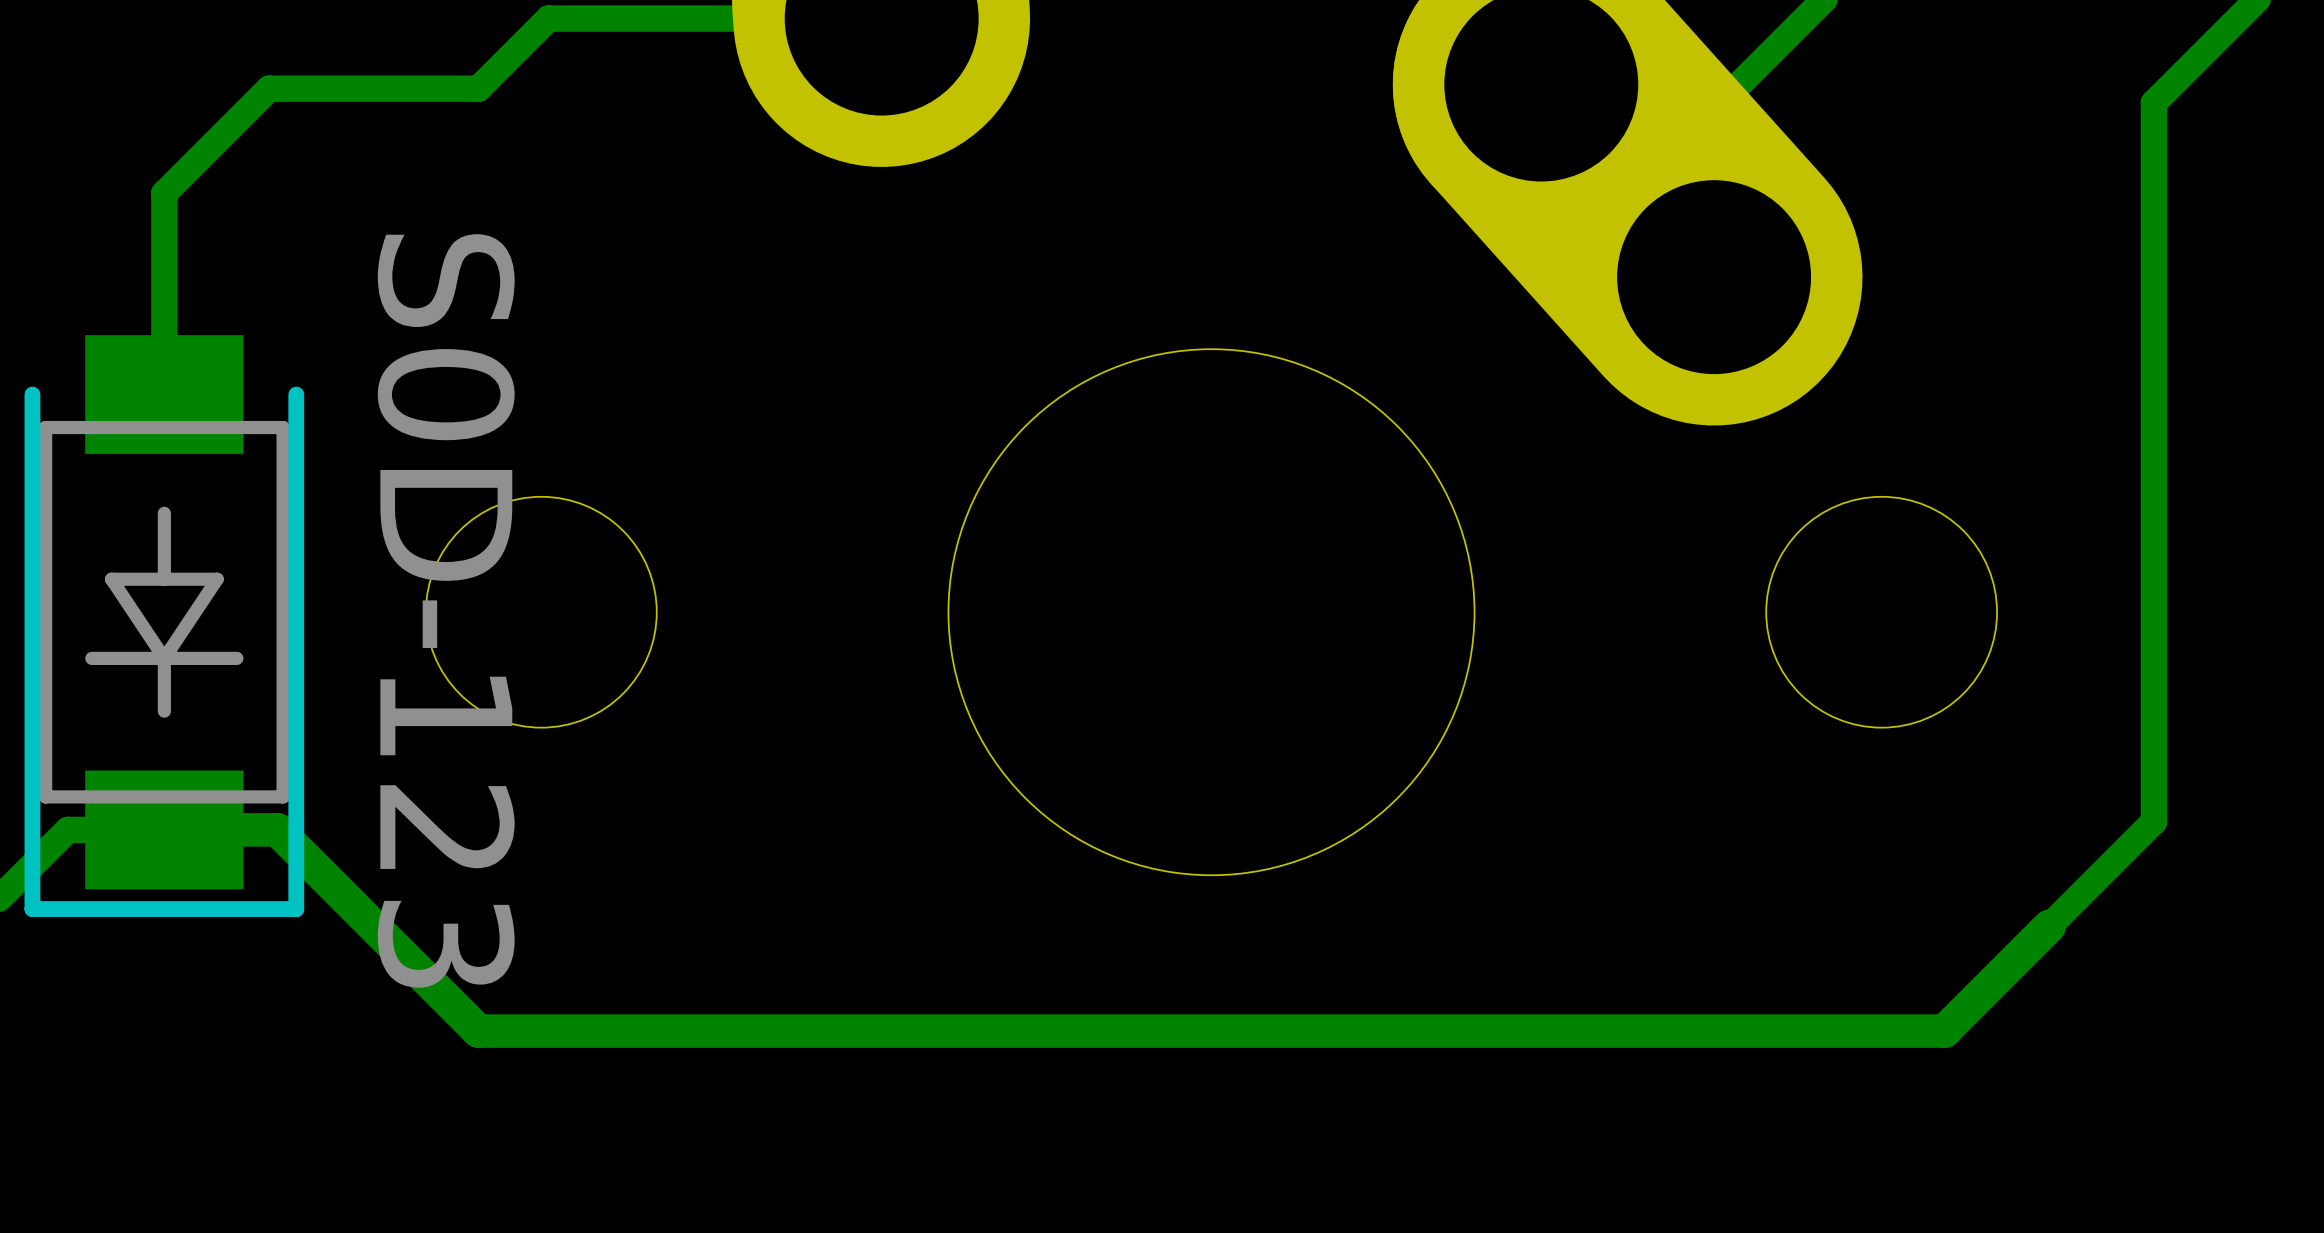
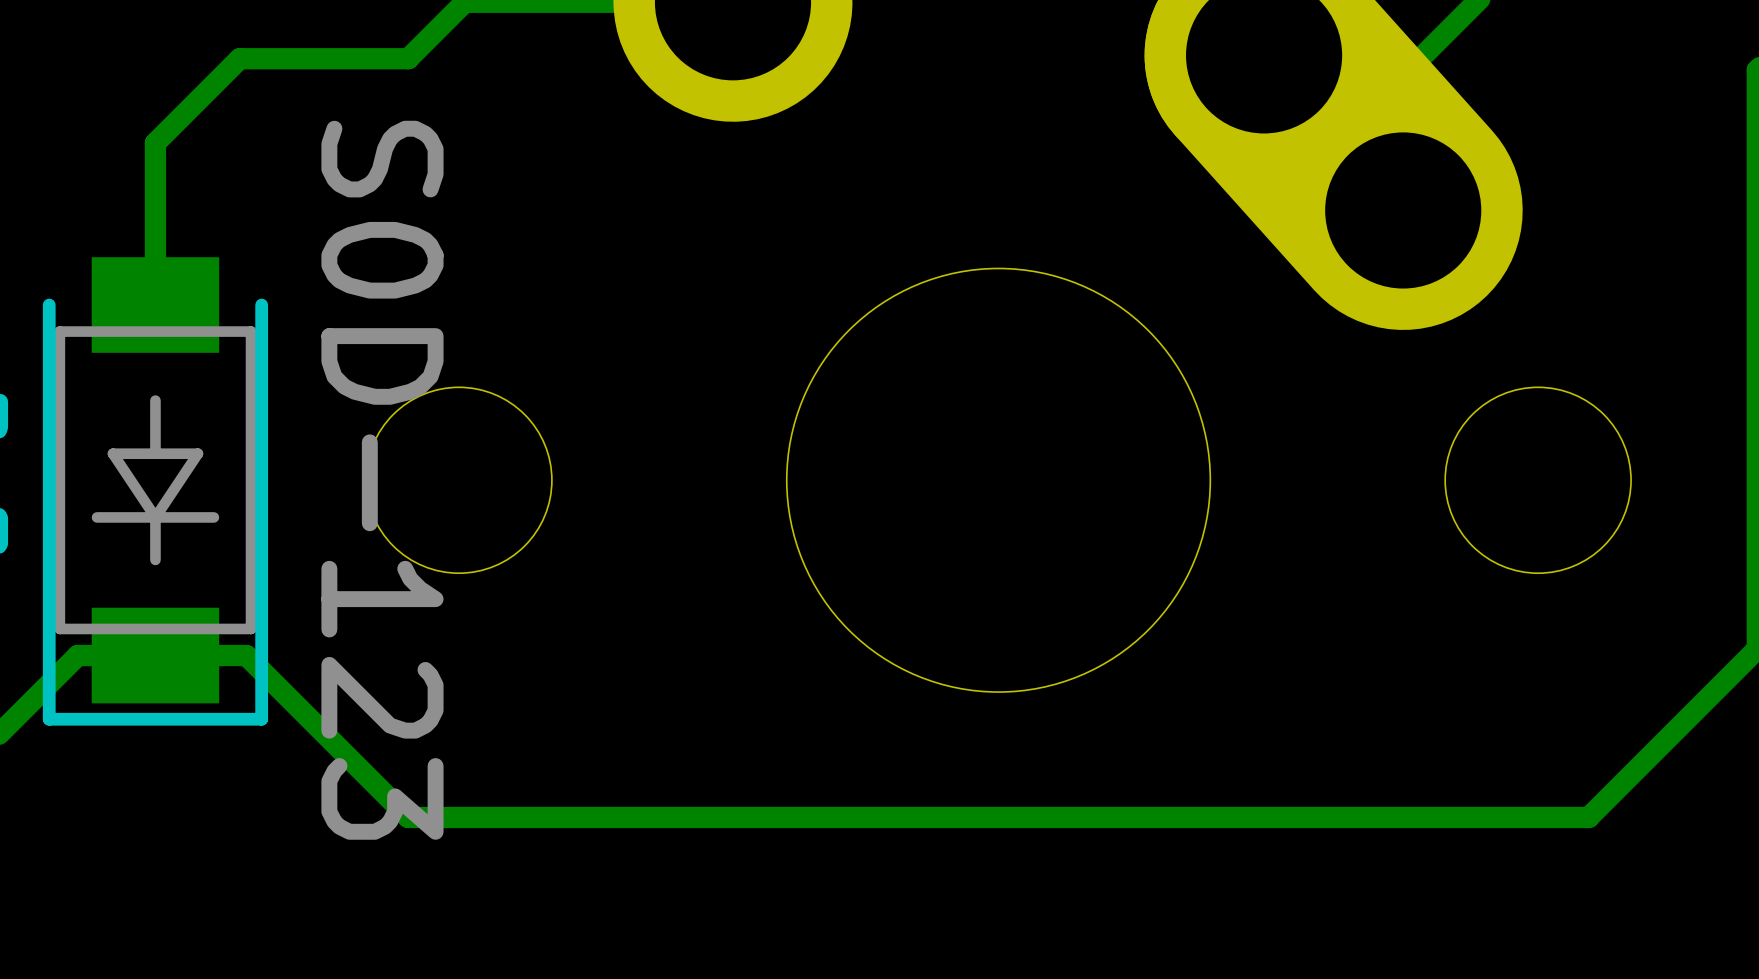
track width: thick (164, 829) (277, 829) (478, 1031) (1944, 1031) (2049, 926) -> thin (155, 655) (246, 655) (408, 817) (1588, 817) (1673, 733)

